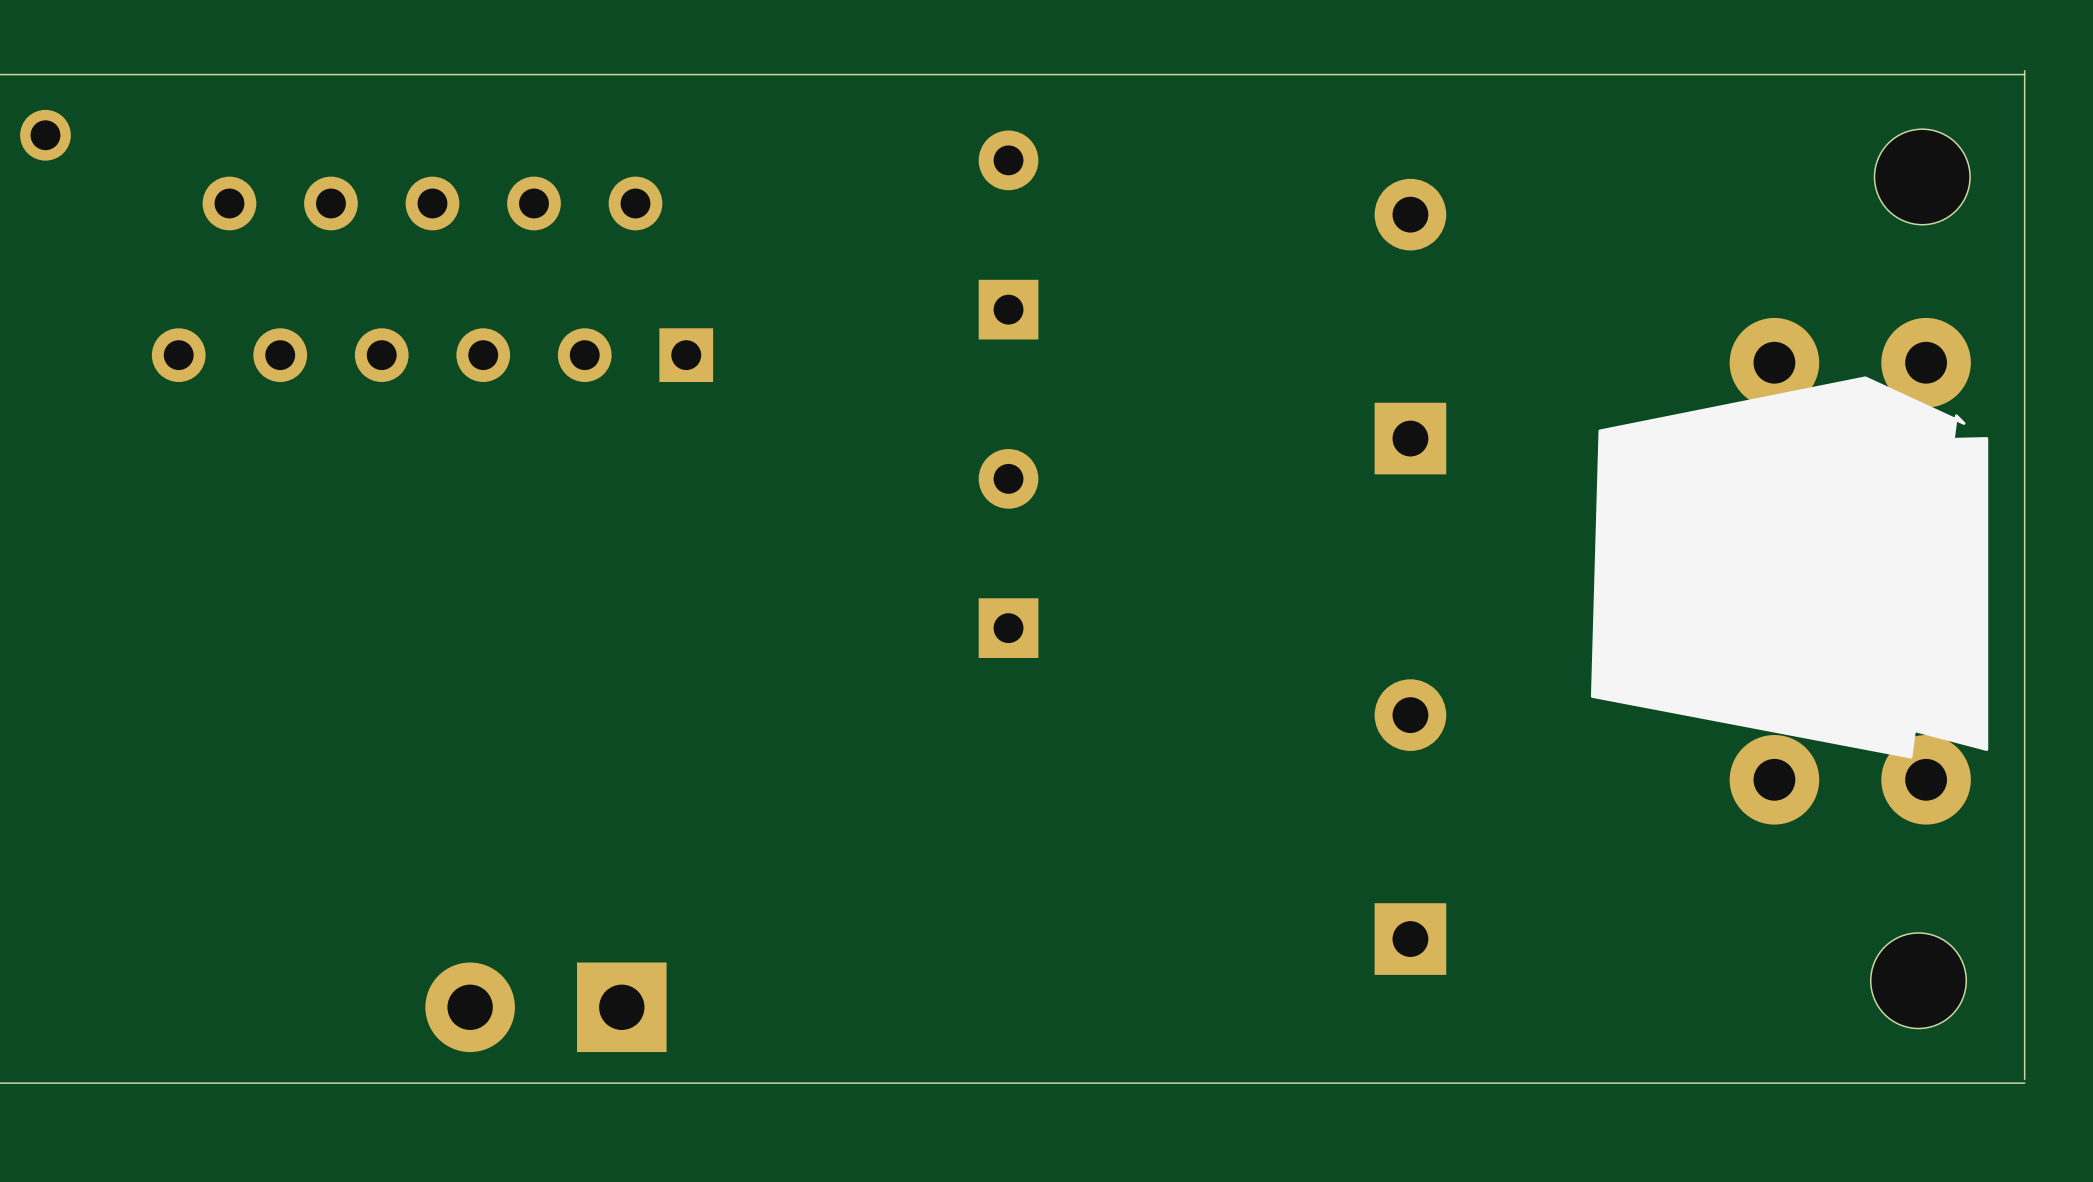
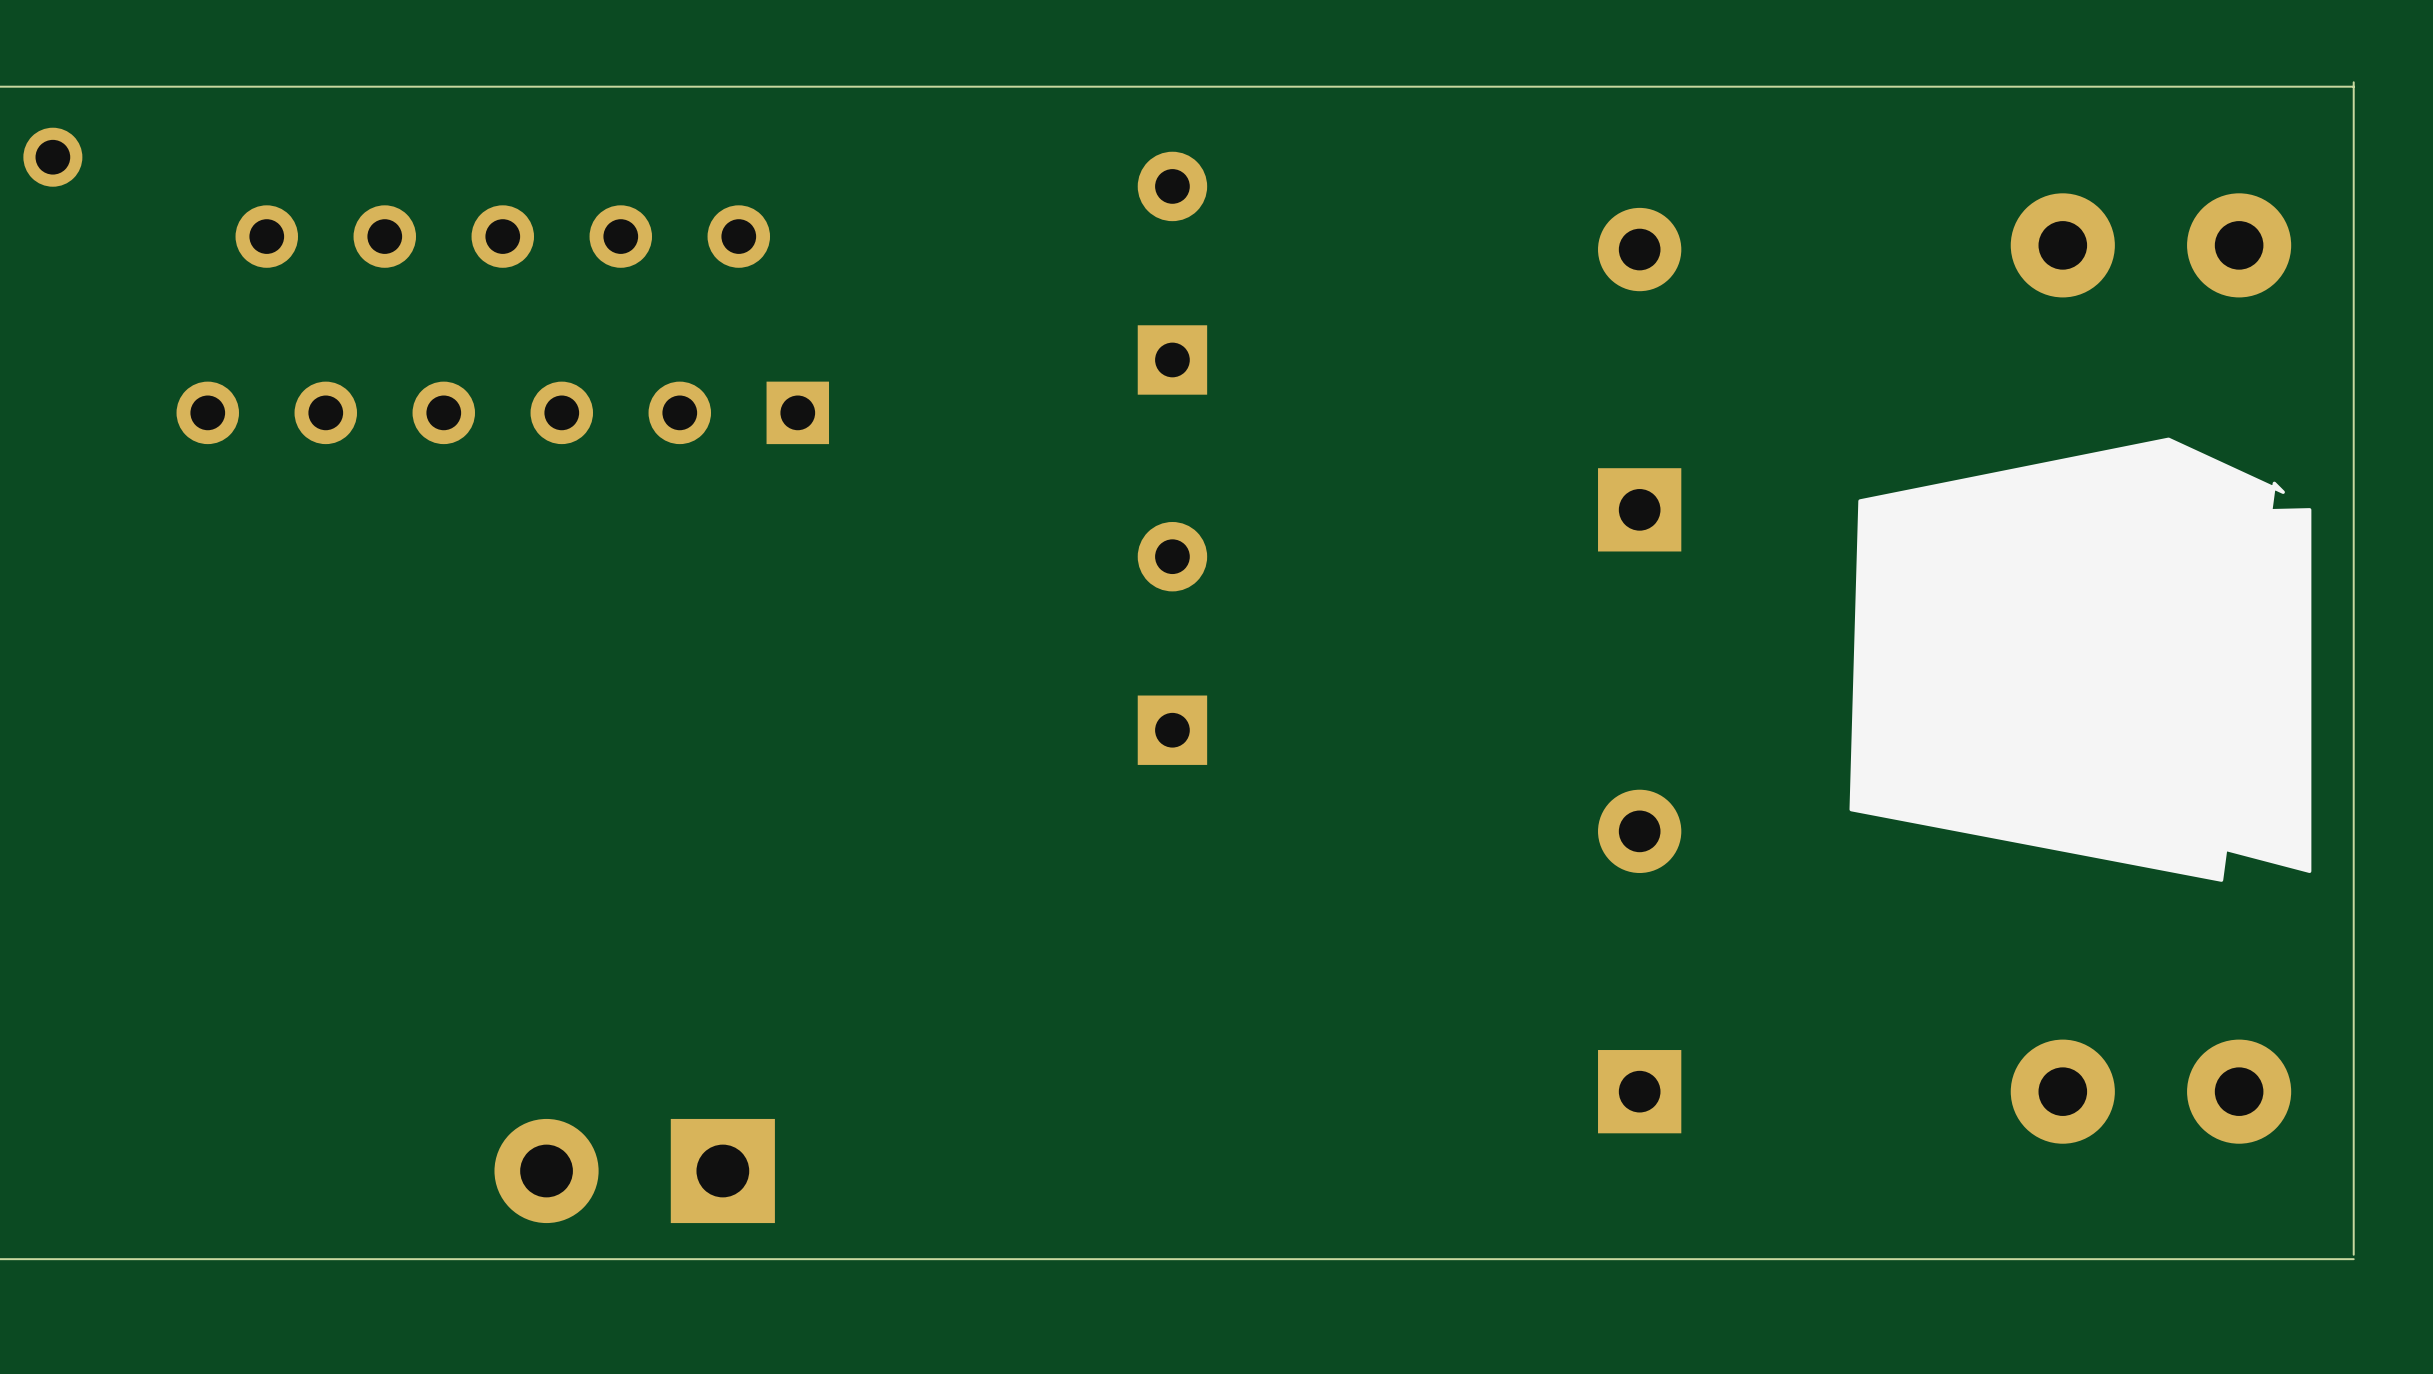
part: (1922, 176) -> none
part position: (1850, 362) -> (2150, 245)
part position: (1850, 779) -> (2150, 1091)
part: (1918, 980) -> none

